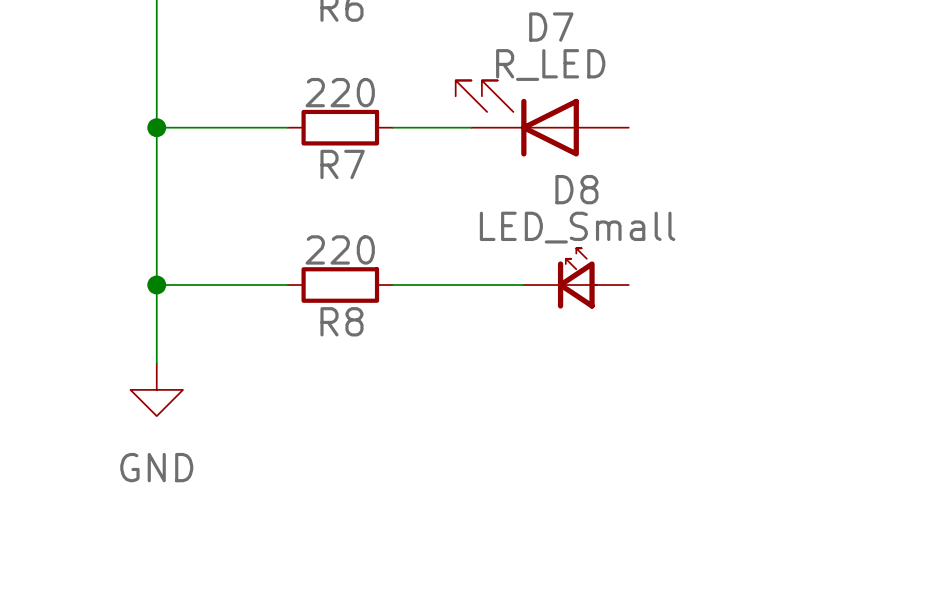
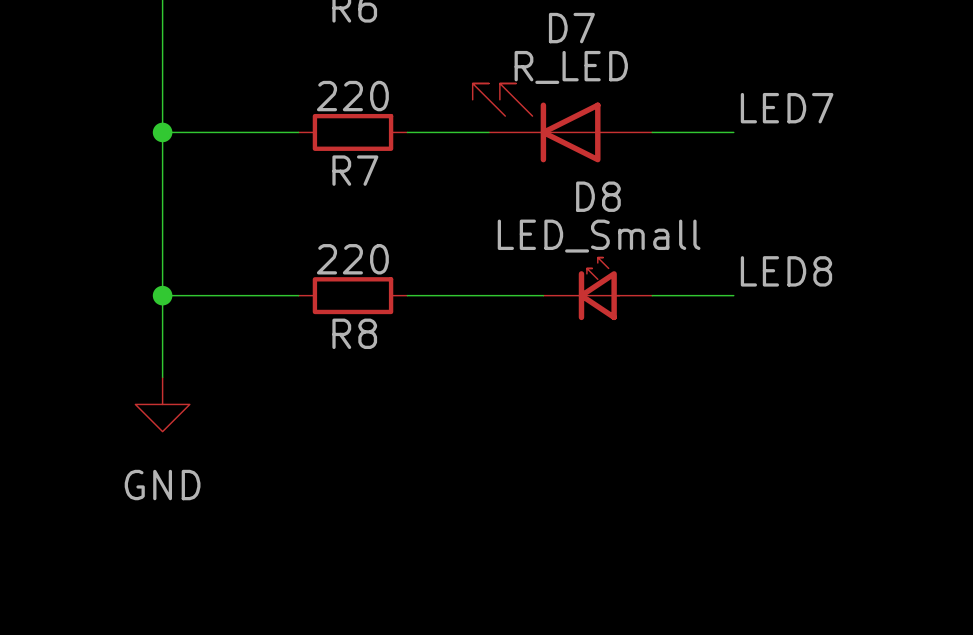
label: none -> LED7 (787, 108)
wire: none -> (652, 132) (733, 132)
label: none -> LED8 (786, 271)
wire: none -> (652, 295) (733, 295)

